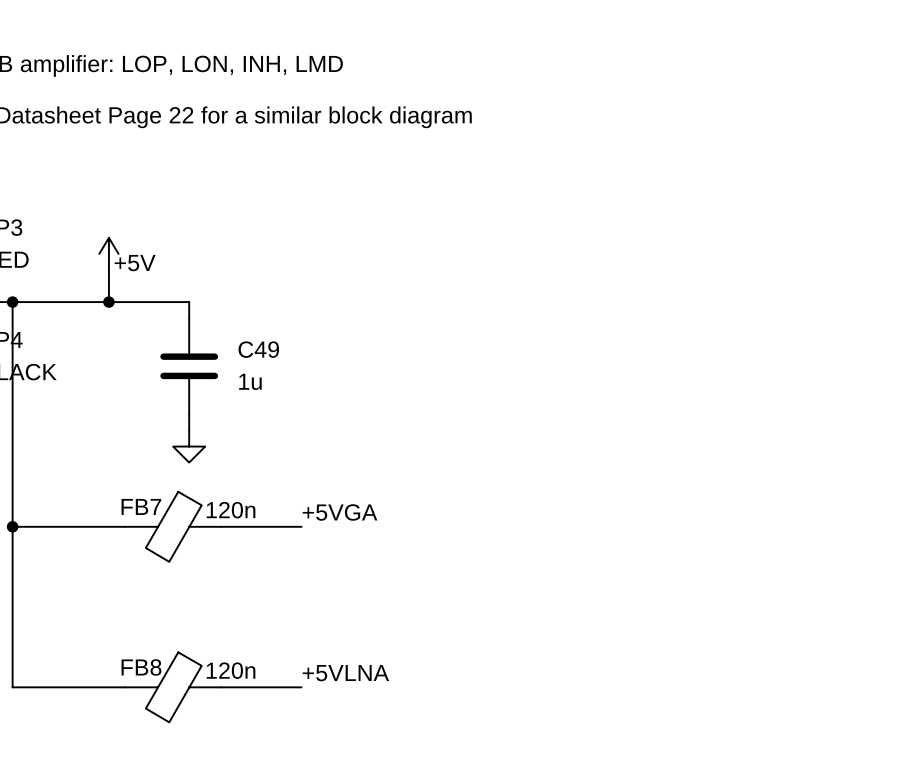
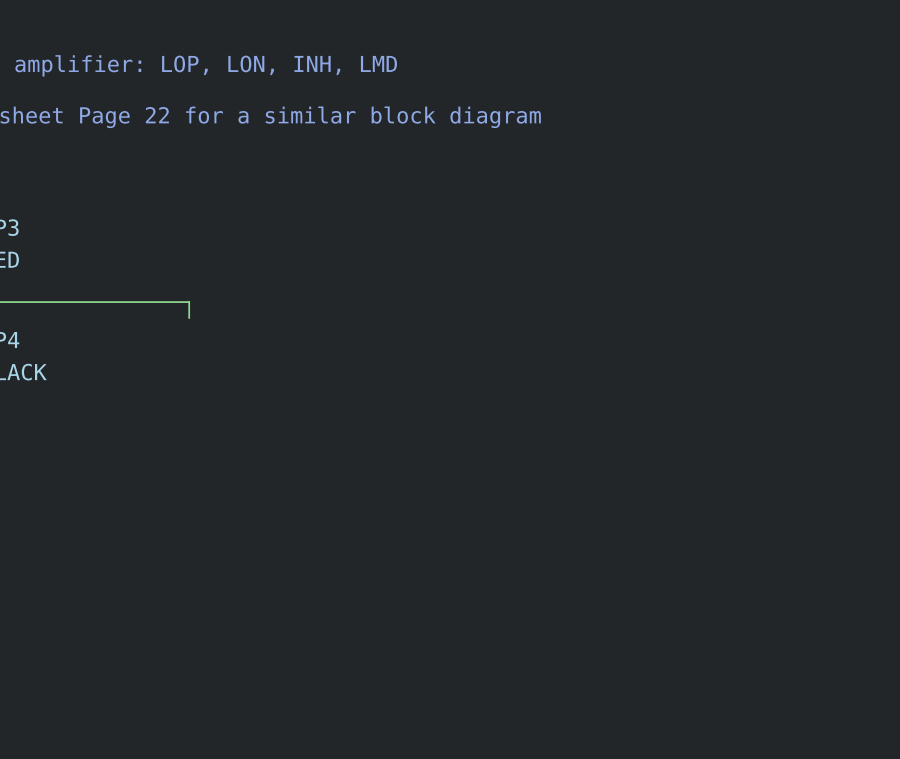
power symbol: +5V (108, 253) -> none
wire: (108, 269) (108, 302) -> none
wire: (12, 302) (12, 687) (124, 687) -> none
junction: (12, 302) -> none
junction: (108, 302) -> none
C49: 1u (189, 366) -> none
wire: (189, 414) (189, 430) -> none
power symbol: (189, 446) -> none
label: +5VGA (340, 512) -> none
wire: (12, 526) (124, 526) -> none
junction: (12, 526) -> none
FB7: 120n (173, 526) -> none
wire: (221, 526) (301, 526) -> none
label: +5VLNA (345, 673) -> none
FB8: 120n (173, 687) -> none
wire: (221, 687) (301, 687) -> none

